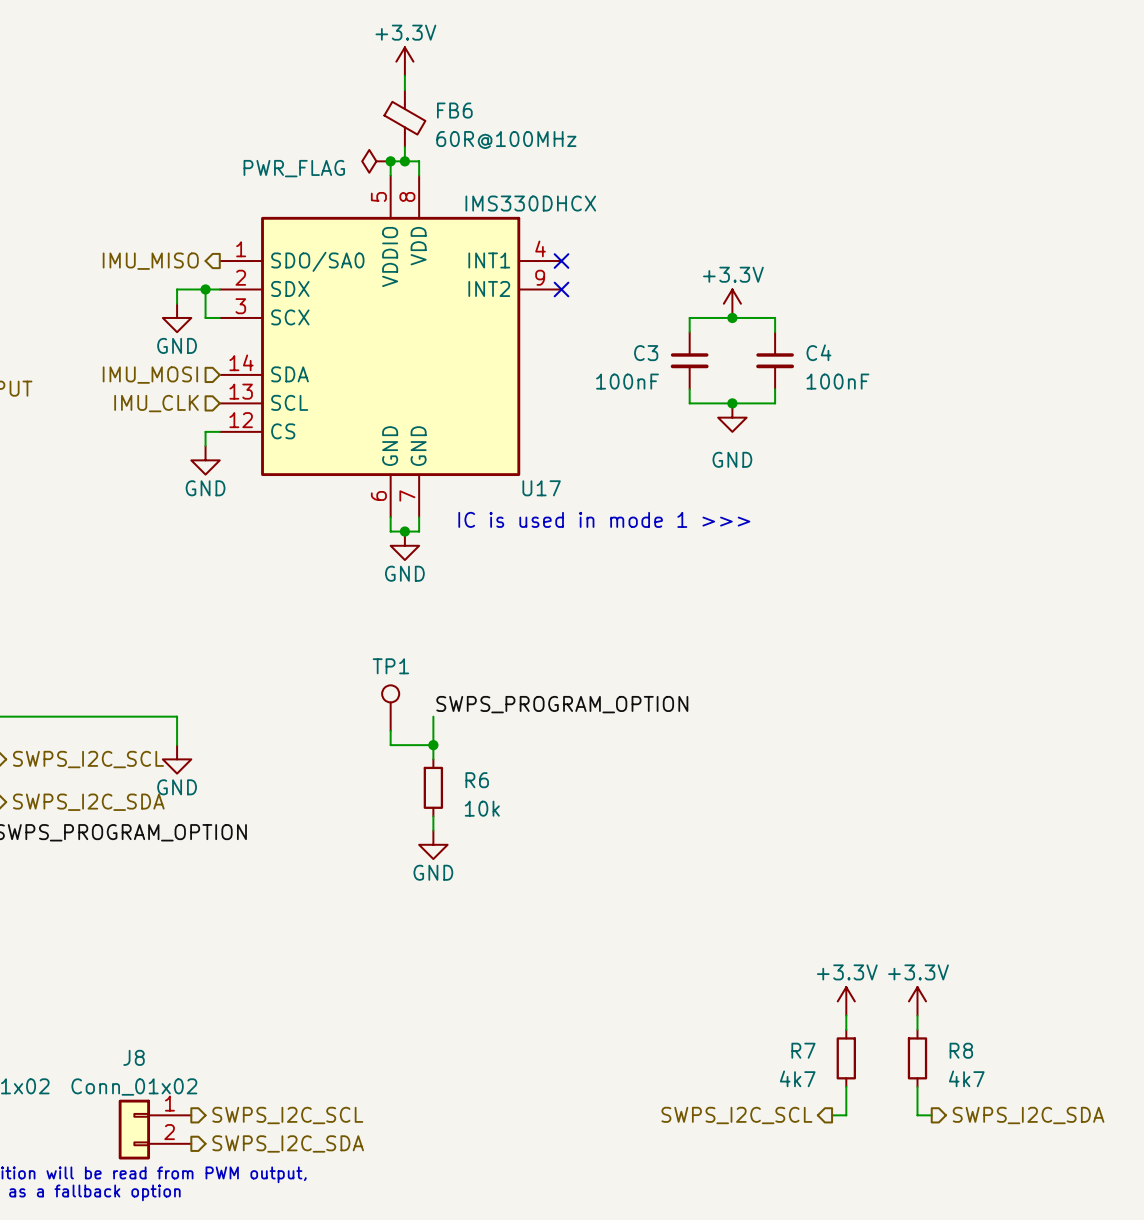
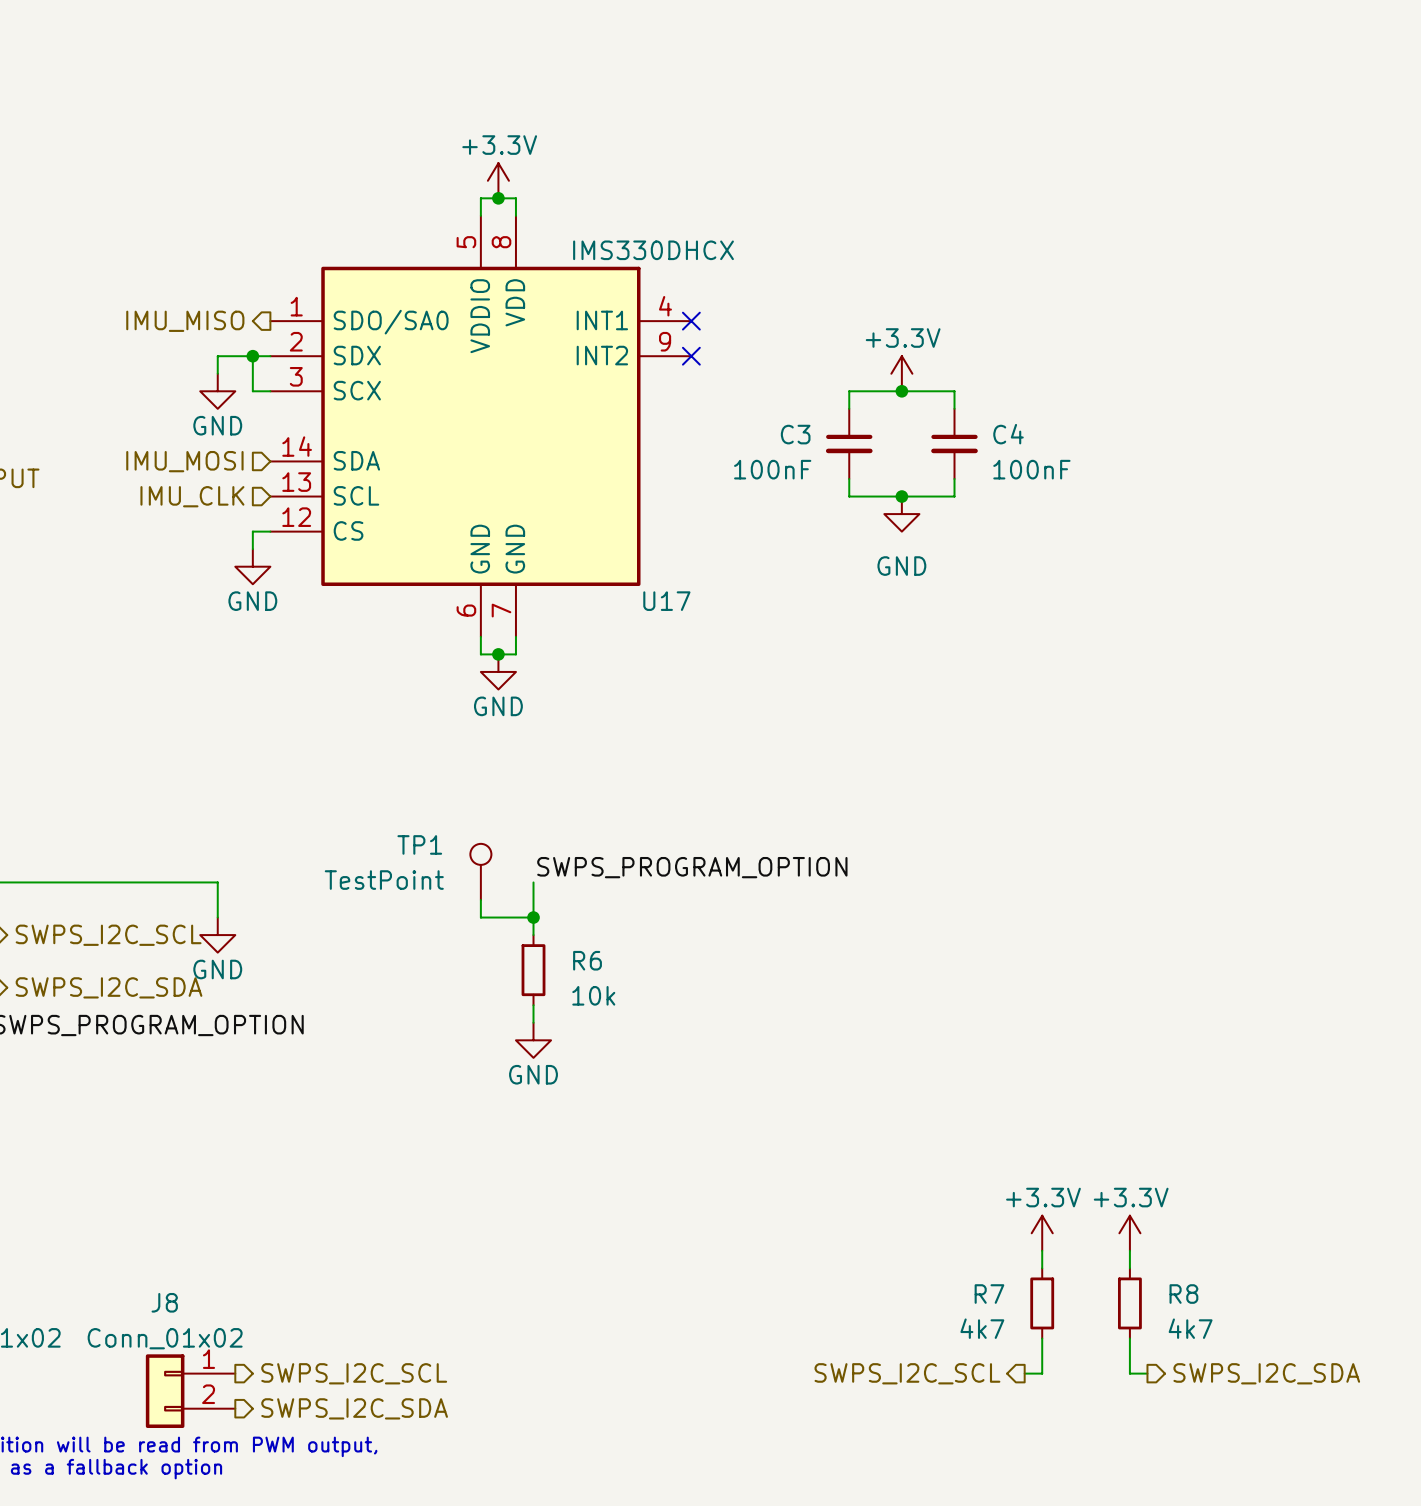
power symbol position: +3.3V (404, 61) -> +3.3V (498, 180)
wire: (404, 75) (404, 90) -> none
FB6: 60R@100MHz (404, 118) -> none
power symbol: PWR_FLAG (376, 161) -> none
junction: (390, 161) -> none
text: IC is used in mode 1 >>> (604, 519) -> none
TP1 name position: TP1 (390, 666) -> TP1 (419, 844)
TP1 value: none -> TestPoint (384, 880)

